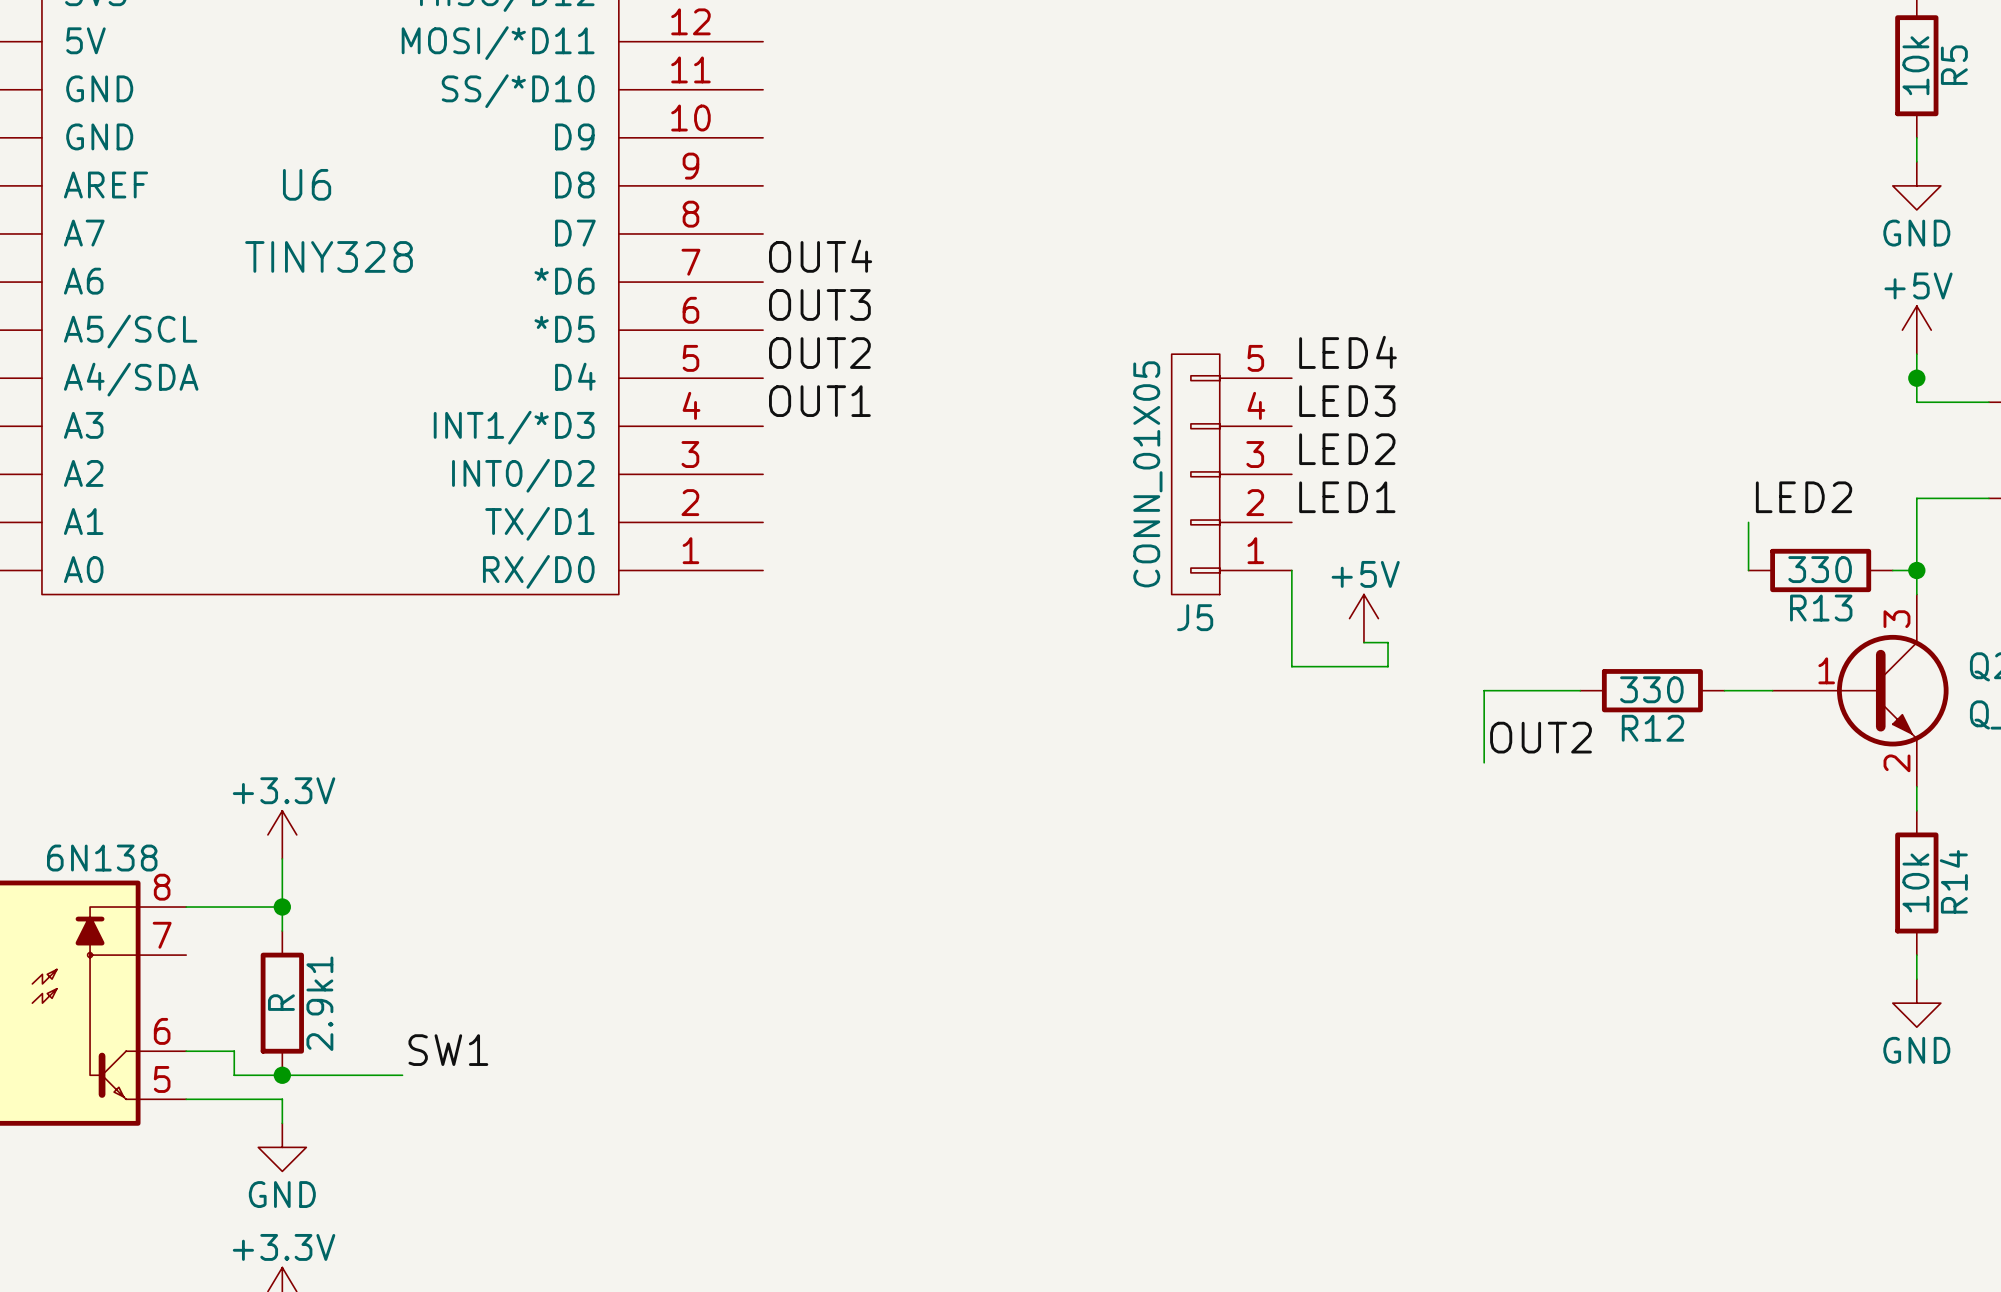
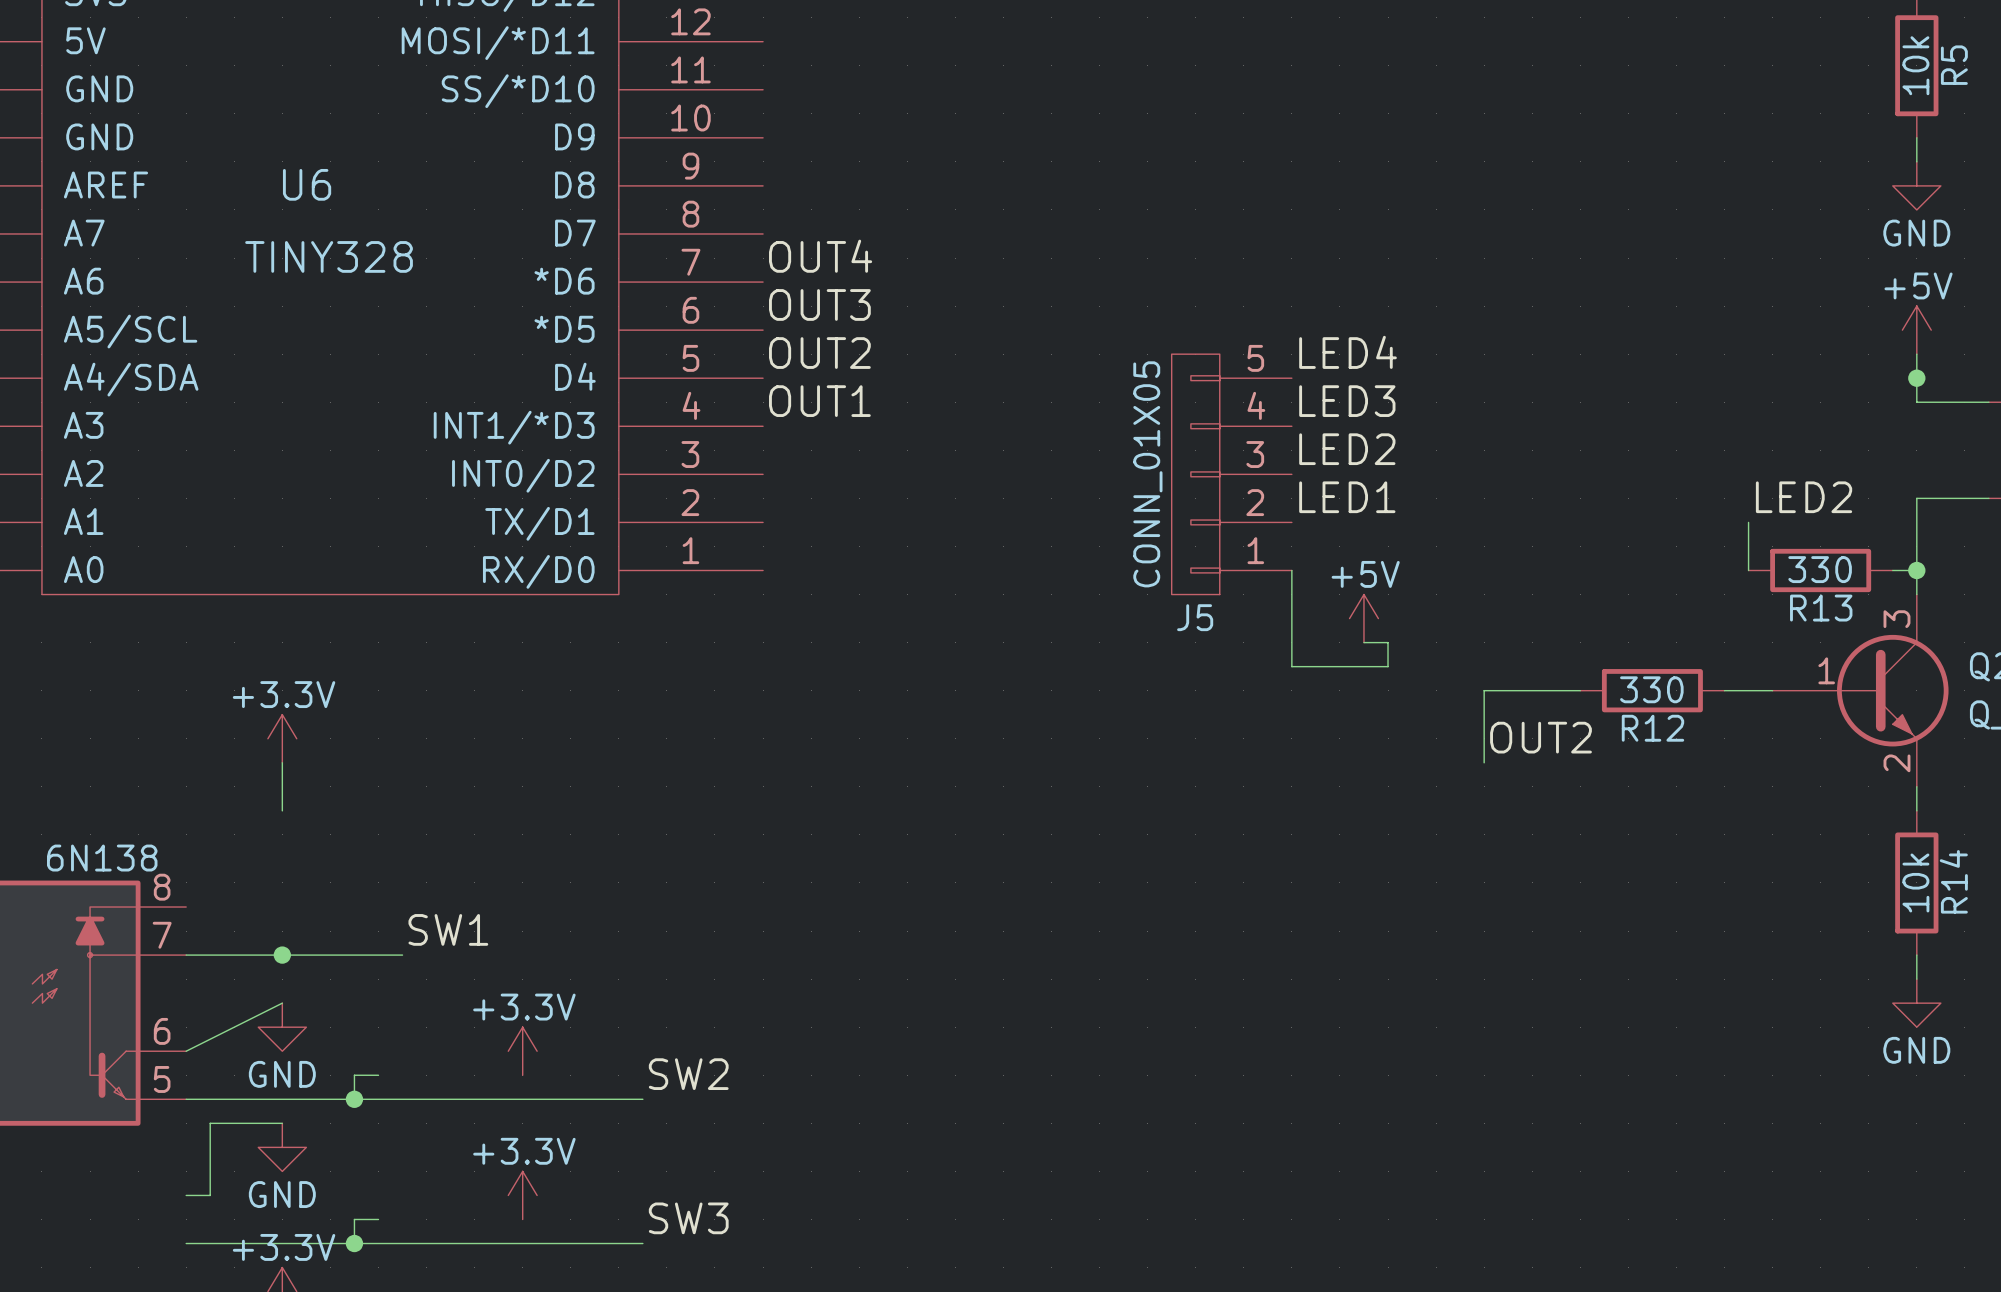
wire: none -> (282, 762) (282, 810)
power symbol position: +3.3V (282, 834) -> +3.3V (282, 738)
wire: (282, 858) (282, 931) -> none
wire: (186, 907) (282, 907) -> none
junction position: (282, 907) -> (282, 955)
wire: none -> (186, 955) (402, 955)
2.9k1: R (282, 1003) -> none
power symbol: none -> GND (282, 1027)
label position: SW1 (448, 1050) -> SW1 (448, 929)
wire: (186, 1051) (234, 1051) (234, 1075) (354, 1075) -> (186, 1051) (282, 1003)
power symbol: none -> +3.3V (522, 1051)
label: none -> SW2 (688, 1074)
junction: (282, 1075) -> none
wire: none -> (354, 1075) (354, 1099)
wire: (378, 1075) (402, 1075) -> none
wire: (282, 1099) (282, 1123) -> (186, 1195) (210, 1195) (210, 1123) (282, 1123)
wire: none -> (282, 1099) (642, 1099)
junction: none -> (354, 1099)
power symbol: none -> +3.3V (522, 1195)
label: none -> SW3 (688, 1218)
wire: none -> (378, 1219) (354, 1219) (354, 1243)
wire: none -> (186, 1243) (642, 1243)
junction: none -> (354, 1243)

